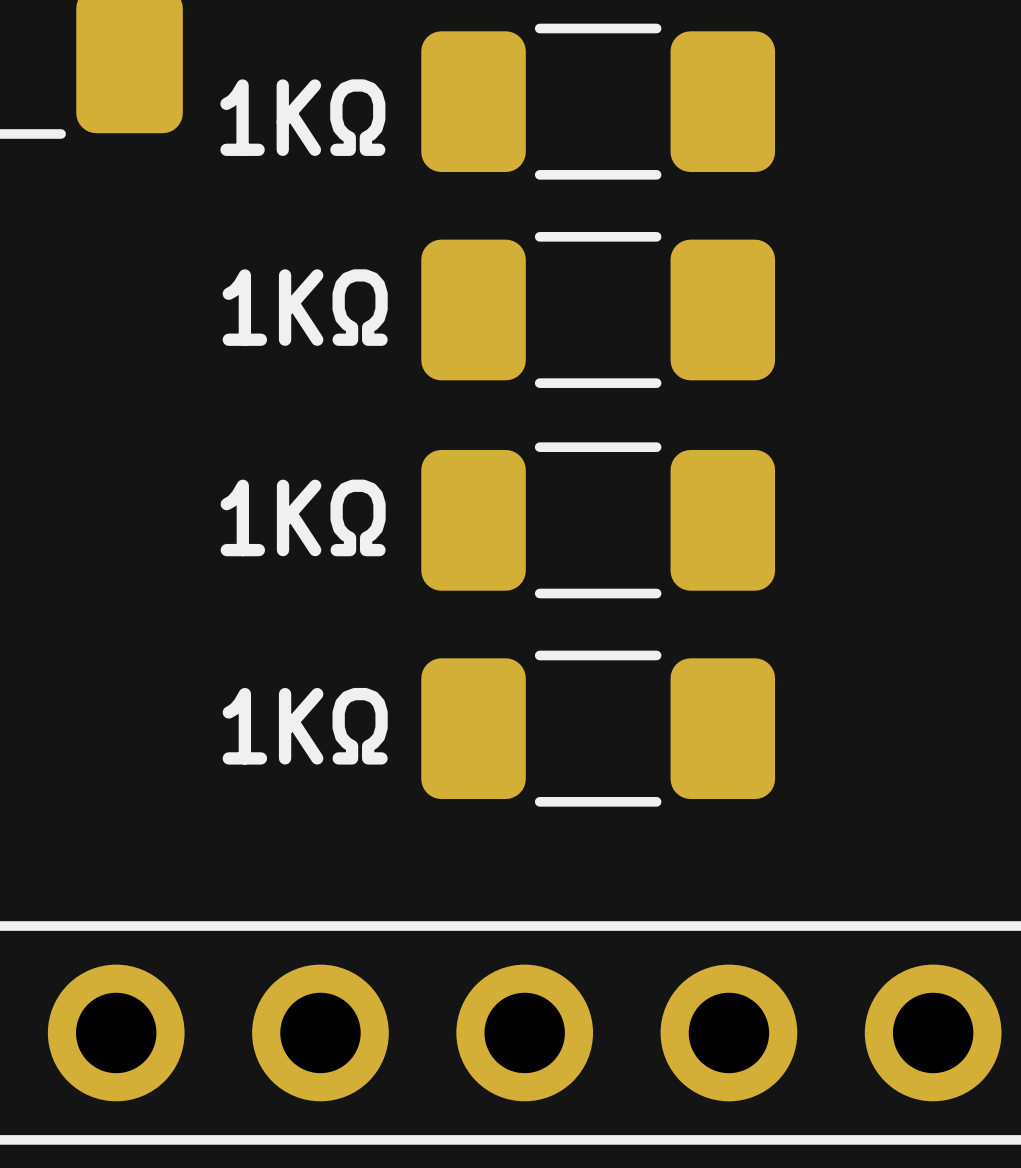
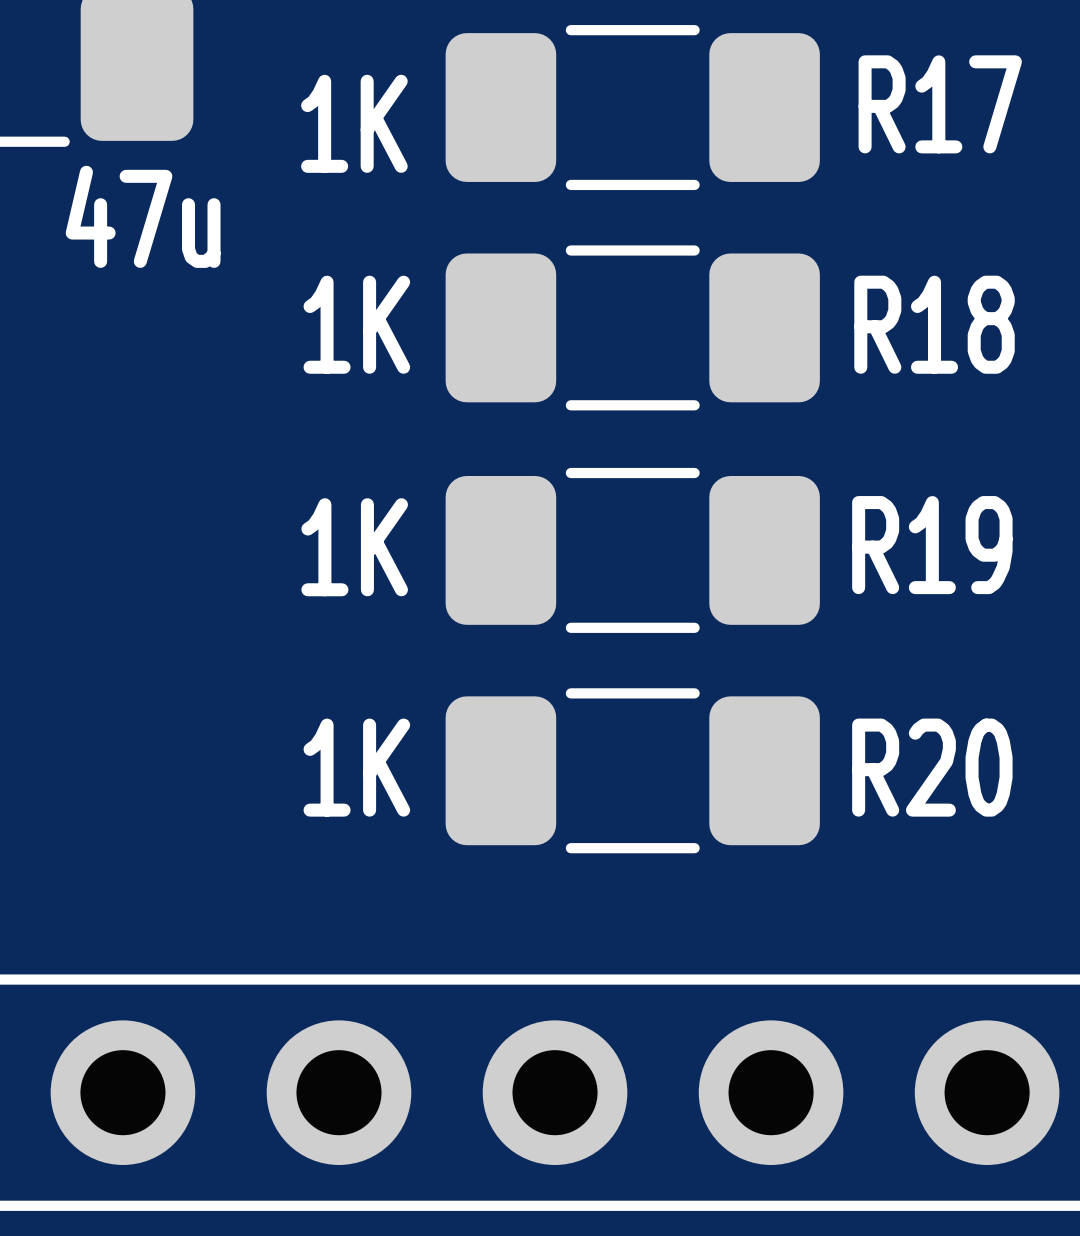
R17 name: none -> R17 (940, 104)
text: 1KΩ (302, 117) -> 1K (354, 123)
text: none -> 47u (143, 216)
R18 name: none -> R18 (934, 324)
text: 1KΩ (305, 307) -> 1K (356, 324)
R19 name: none -> R19 (932, 545)
text: 1KΩ (303, 517) -> 1K (354, 547)
R20 name: none -> R20 (932, 767)
text: 1KΩ (305, 726) -> 1K (356, 767)

